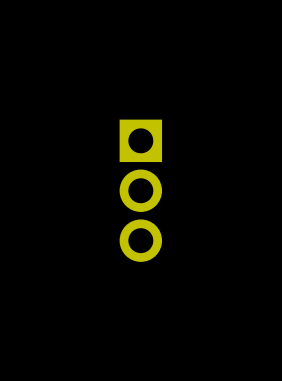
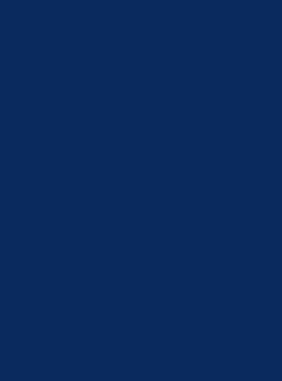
part: (140, 190) -> none

